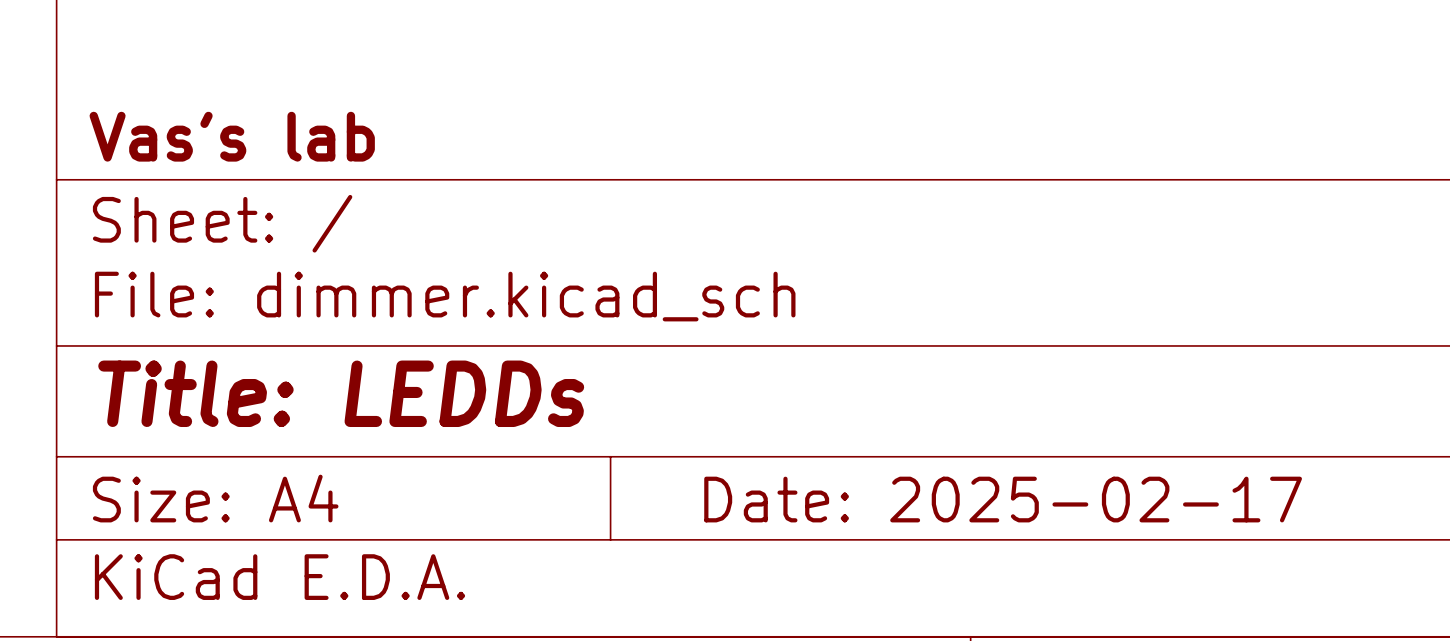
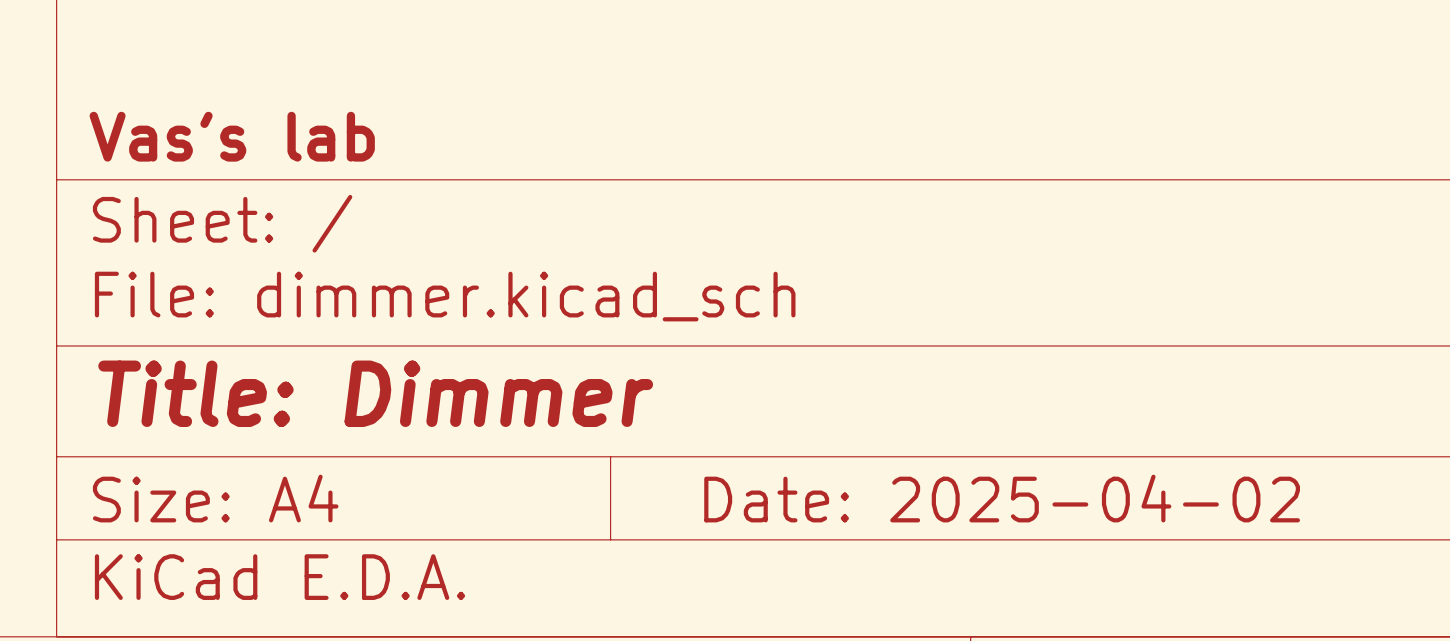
title block: Title: LEDDs (341, 393) -> Title: Dimmer (375, 393)
title block: Date: 2025-02-17 (1003, 499) -> Date: 2025-04-02 (1002, 498)

